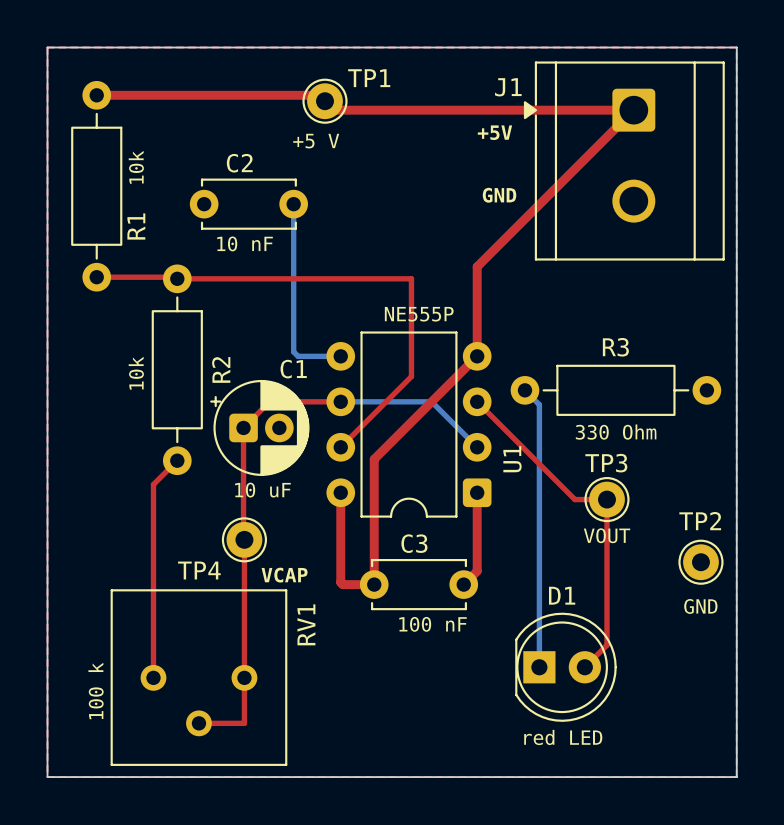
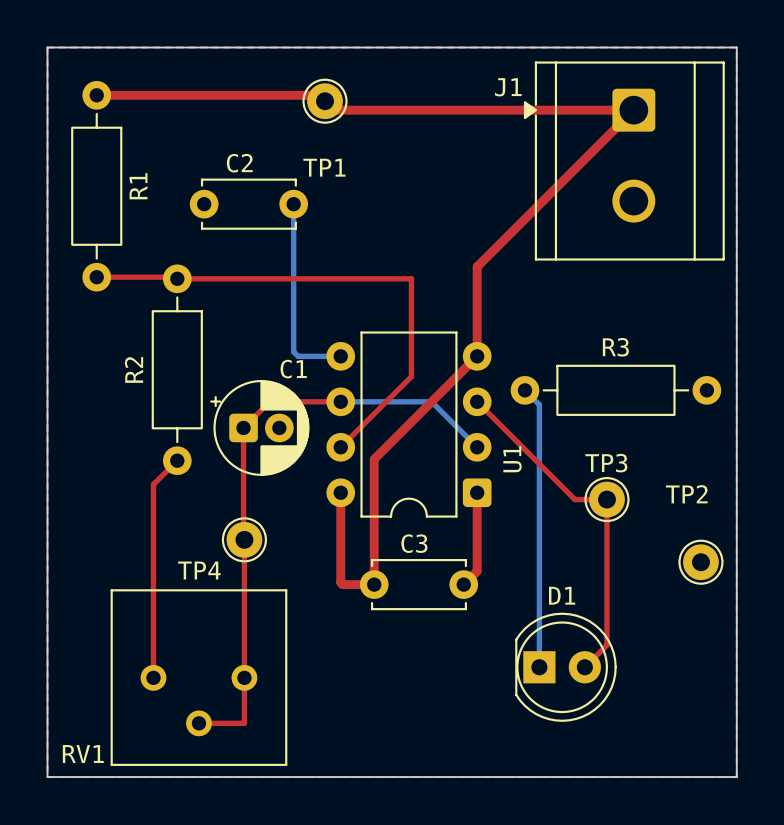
TP1 name position: TP1 (369, 78) -> TP1 (324, 167)
text: +5V (494, 132) -> none
TP1 value: +5 V (316, 141) -> none
R1 value: 10k (136, 167) -> none
text: GND (499, 195) -> none
R1 name position: R1 (136, 226) -> R1 (138, 186)
C2 value: 10 nF (245, 243) -> none
U1 value: NE555P (419, 314) -> none
R2 name position: R2 (221, 369) -> R2 (134, 369)
R2 value: 10k (136, 373) -> none
R3 value: 330 Ohm (616, 432) -> none
C1 value: 10 uF (262, 490) -> none
TP2 name position: TP2 (700, 521) -> TP2 (686, 494)
TP3 value: VOUT (607, 535) -> none
TP4 value: VCAP (284, 575) -> none
TP2 value: GND (700, 606) -> none
RV1 name rotation: 0° (306, 624) -> 90° clockwise (83, 754)
RV1 name position: RV1 (306, 624) -> RV1 (83, 754)
C3 value: 100 nF (433, 624) -> none
RV1 value: 100 k (96, 690) -> none
D1 value: red LED (563, 737) -> none

